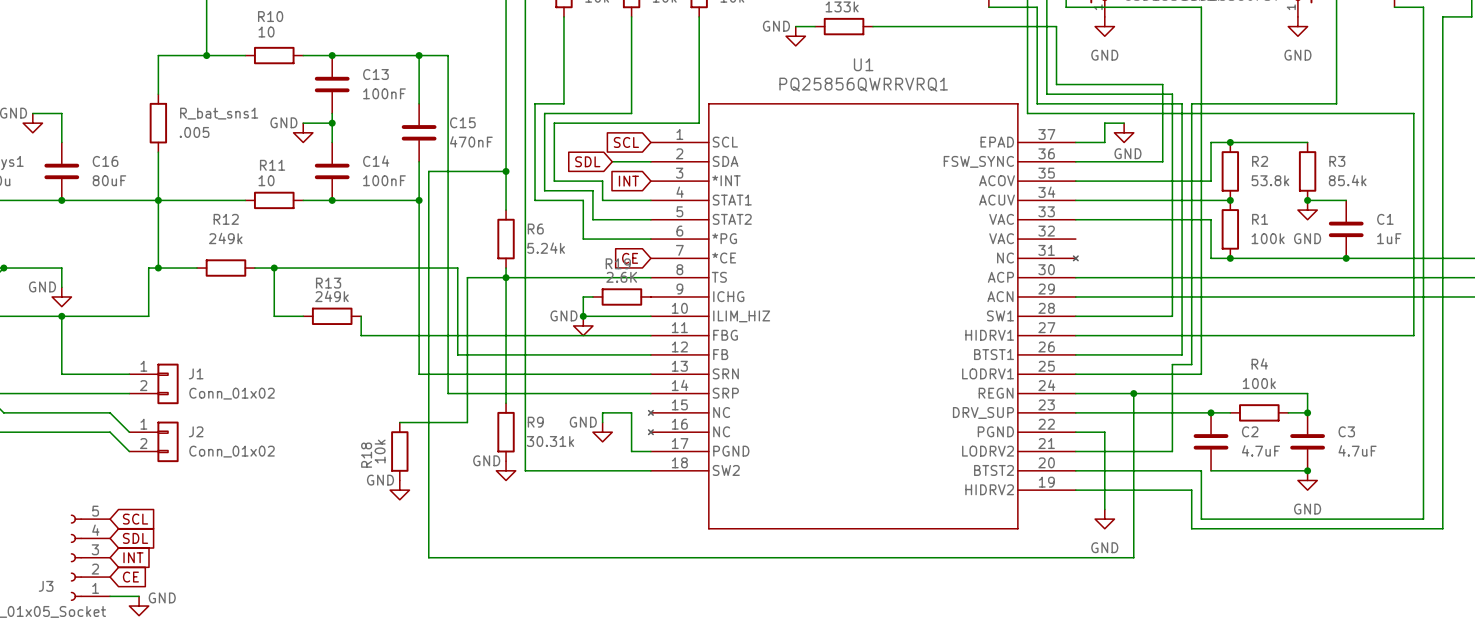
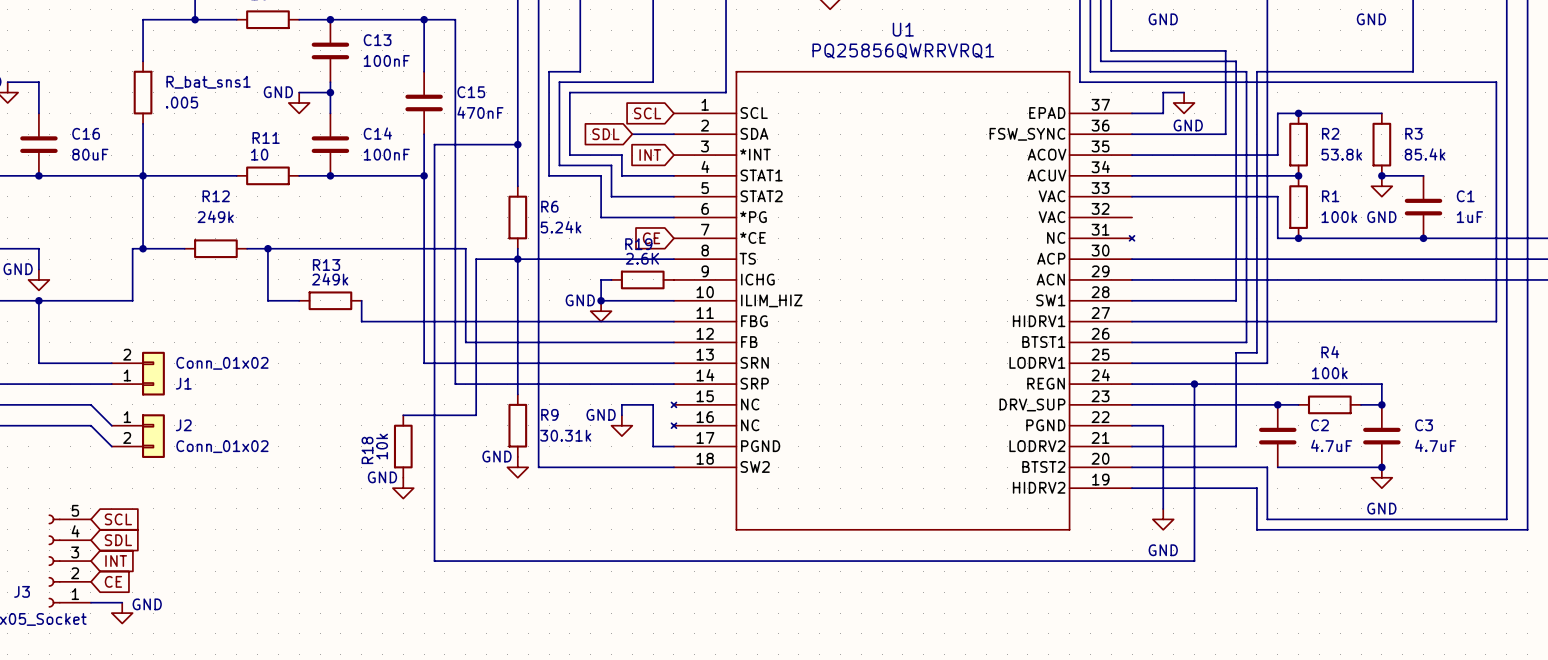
J1 flip: as is (168, 383) -> up-down (153, 373)

